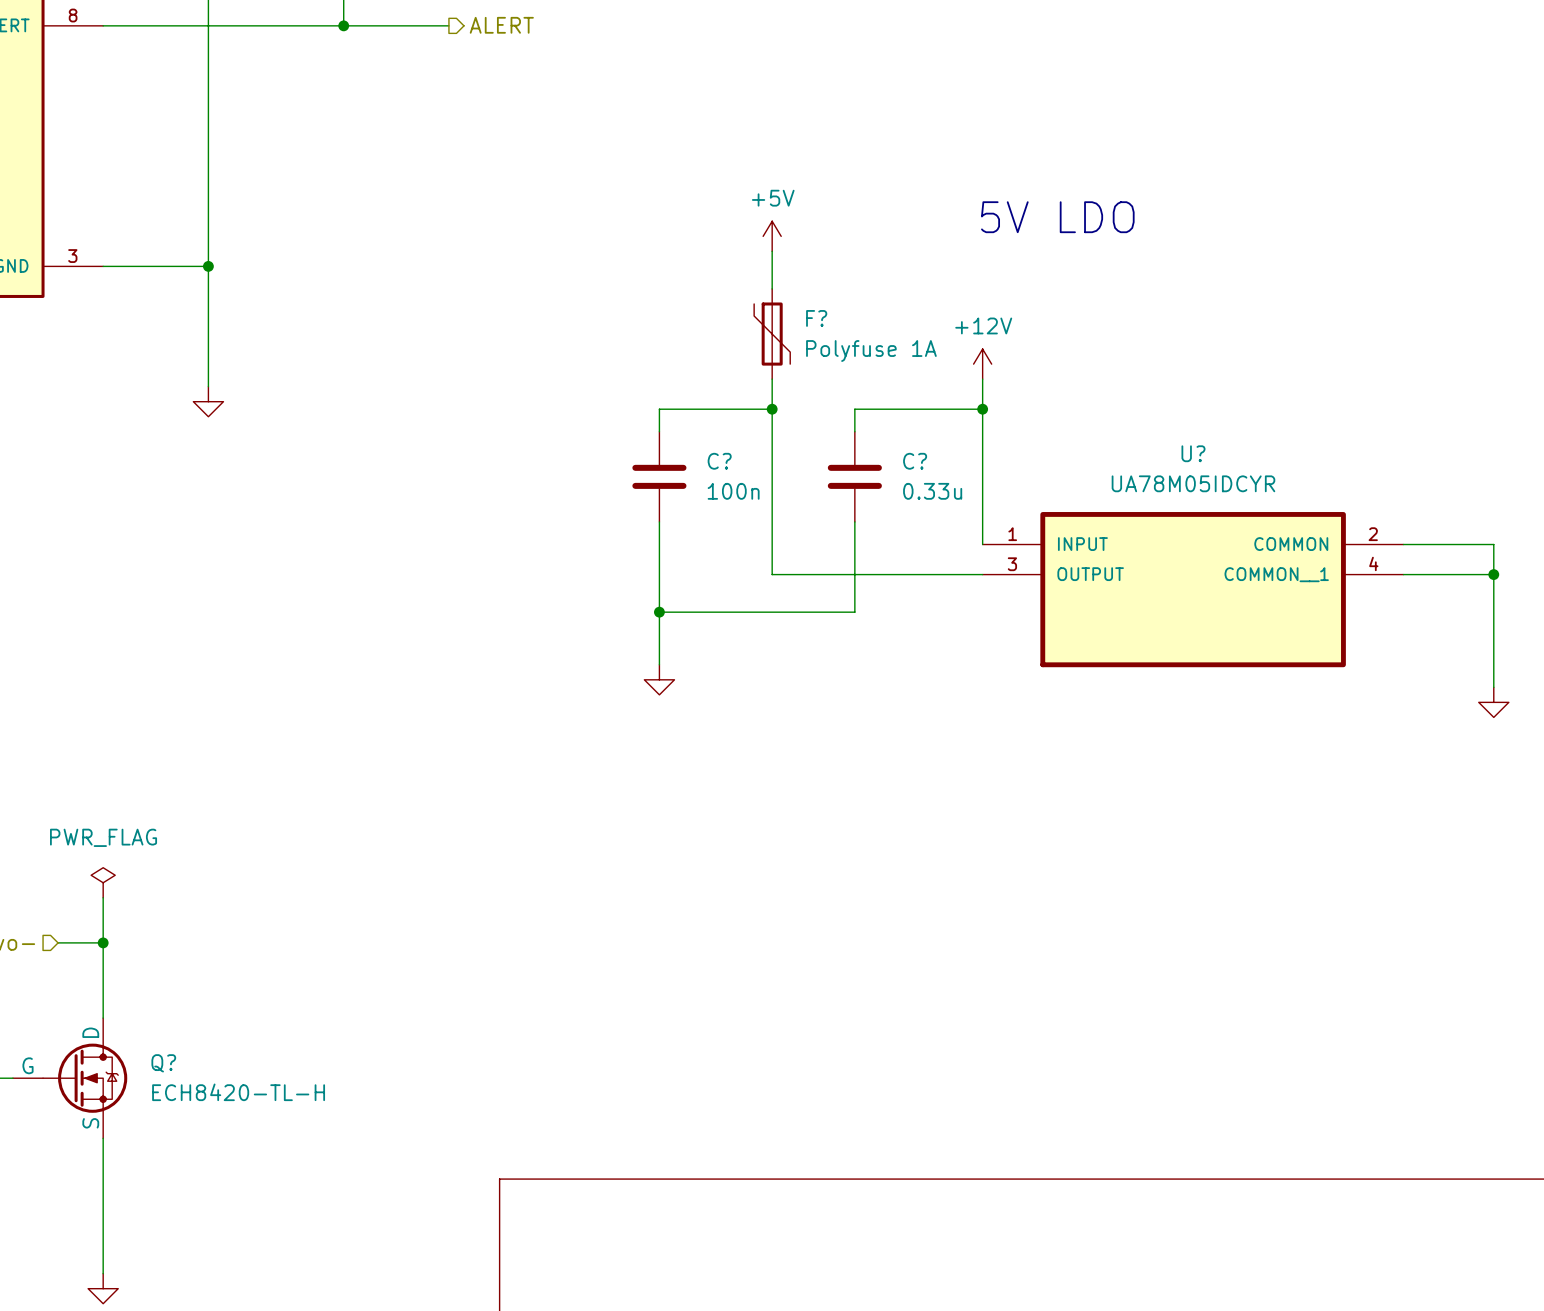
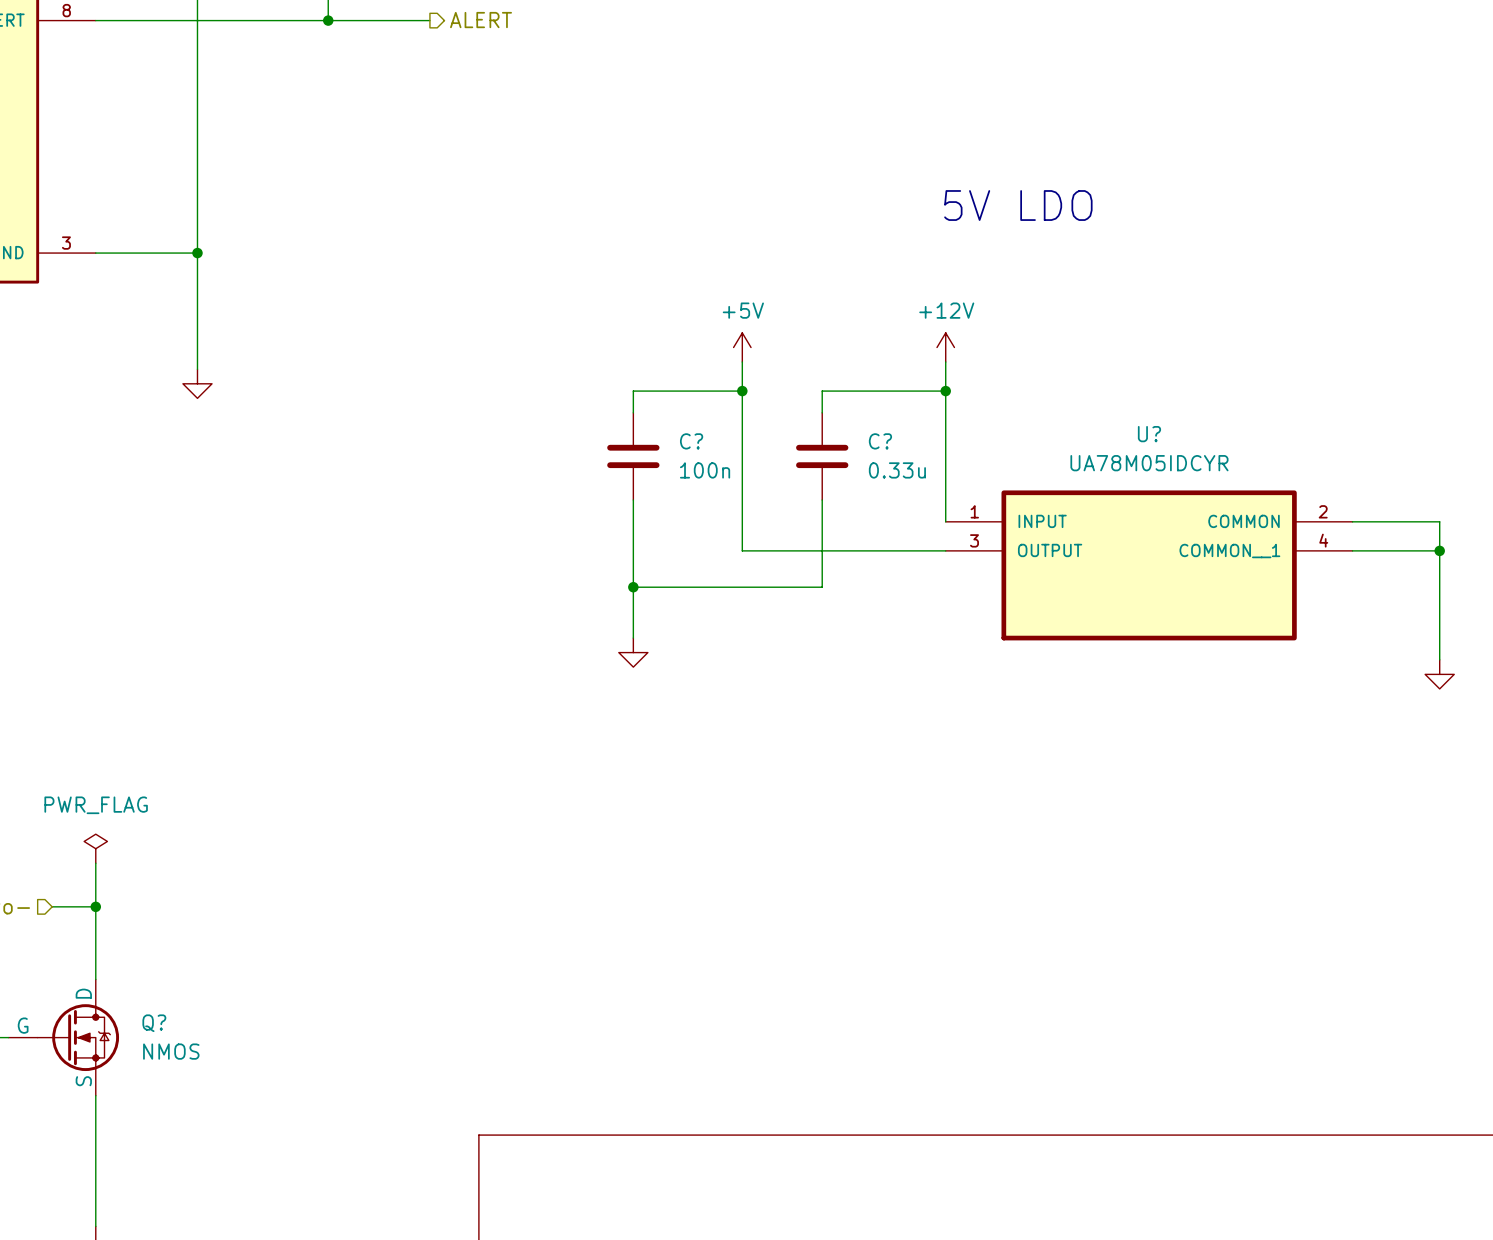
power symbol position: +5V (772, 236) -> +5V (742, 347)
wire: (772, 251) (772, 288) -> none
F?: Polyfuse 1A (772, 334) -> none
Q? value: ECH8420-TL-H (238, 1092) -> NMOS (171, 1051)

